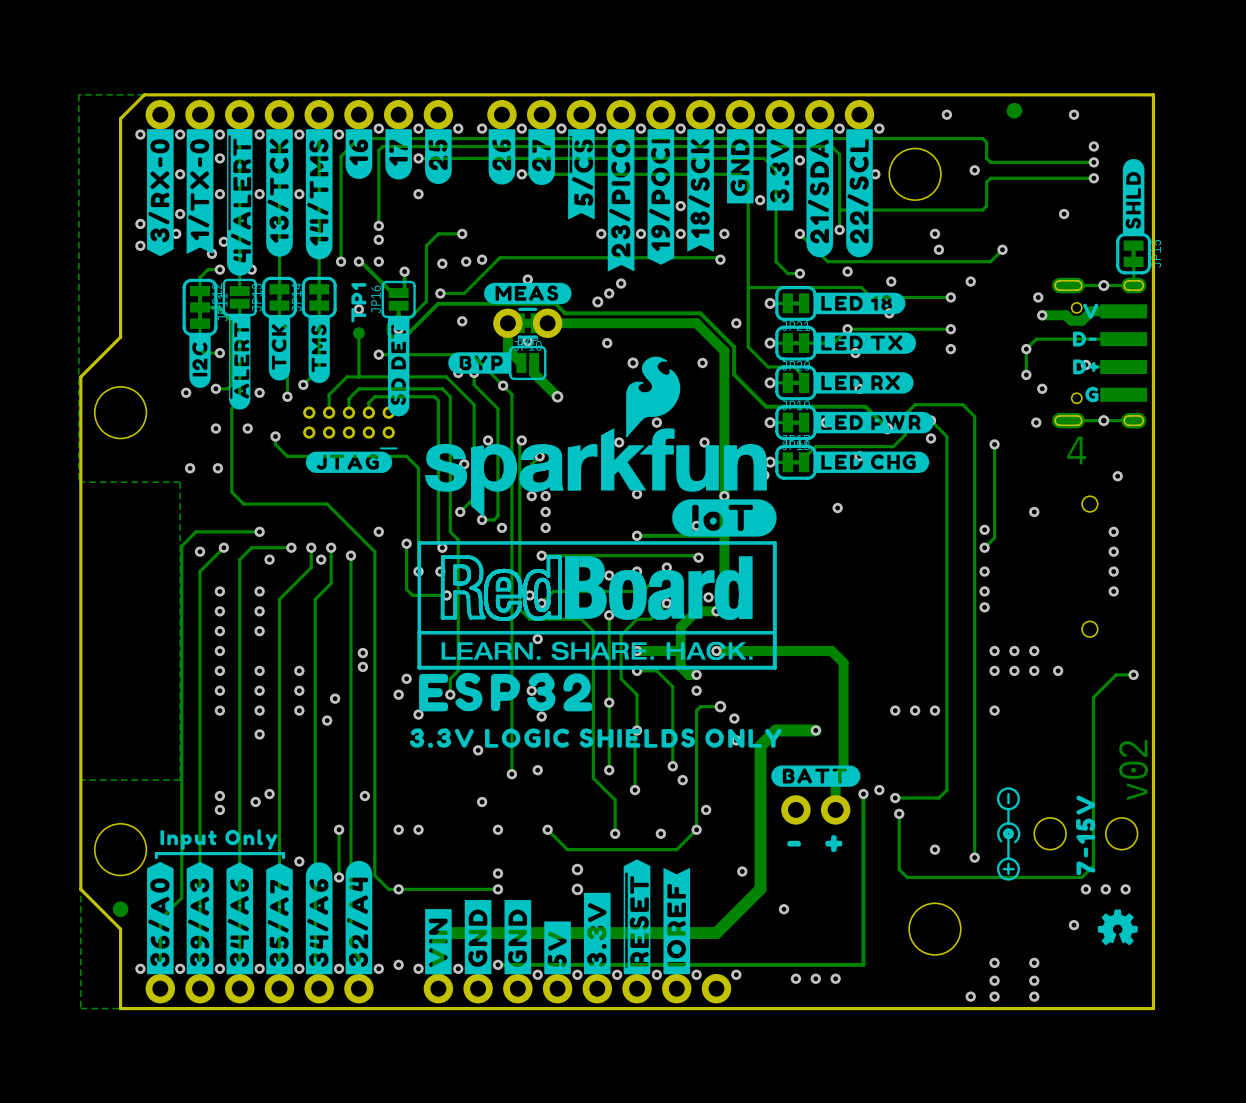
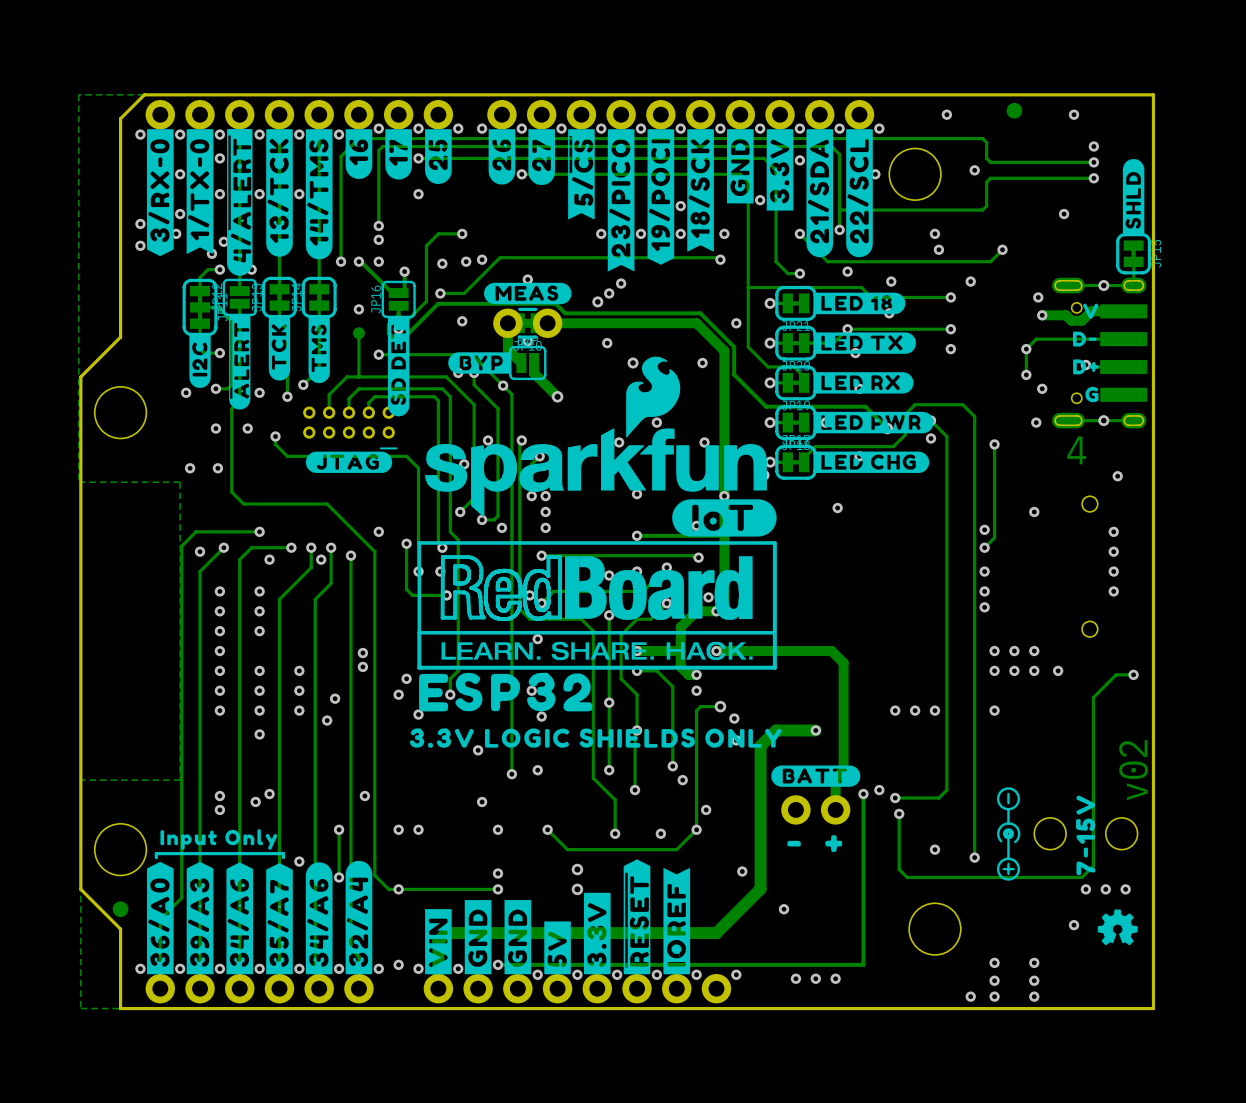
drawing: [351, 283, 367, 323] -> none

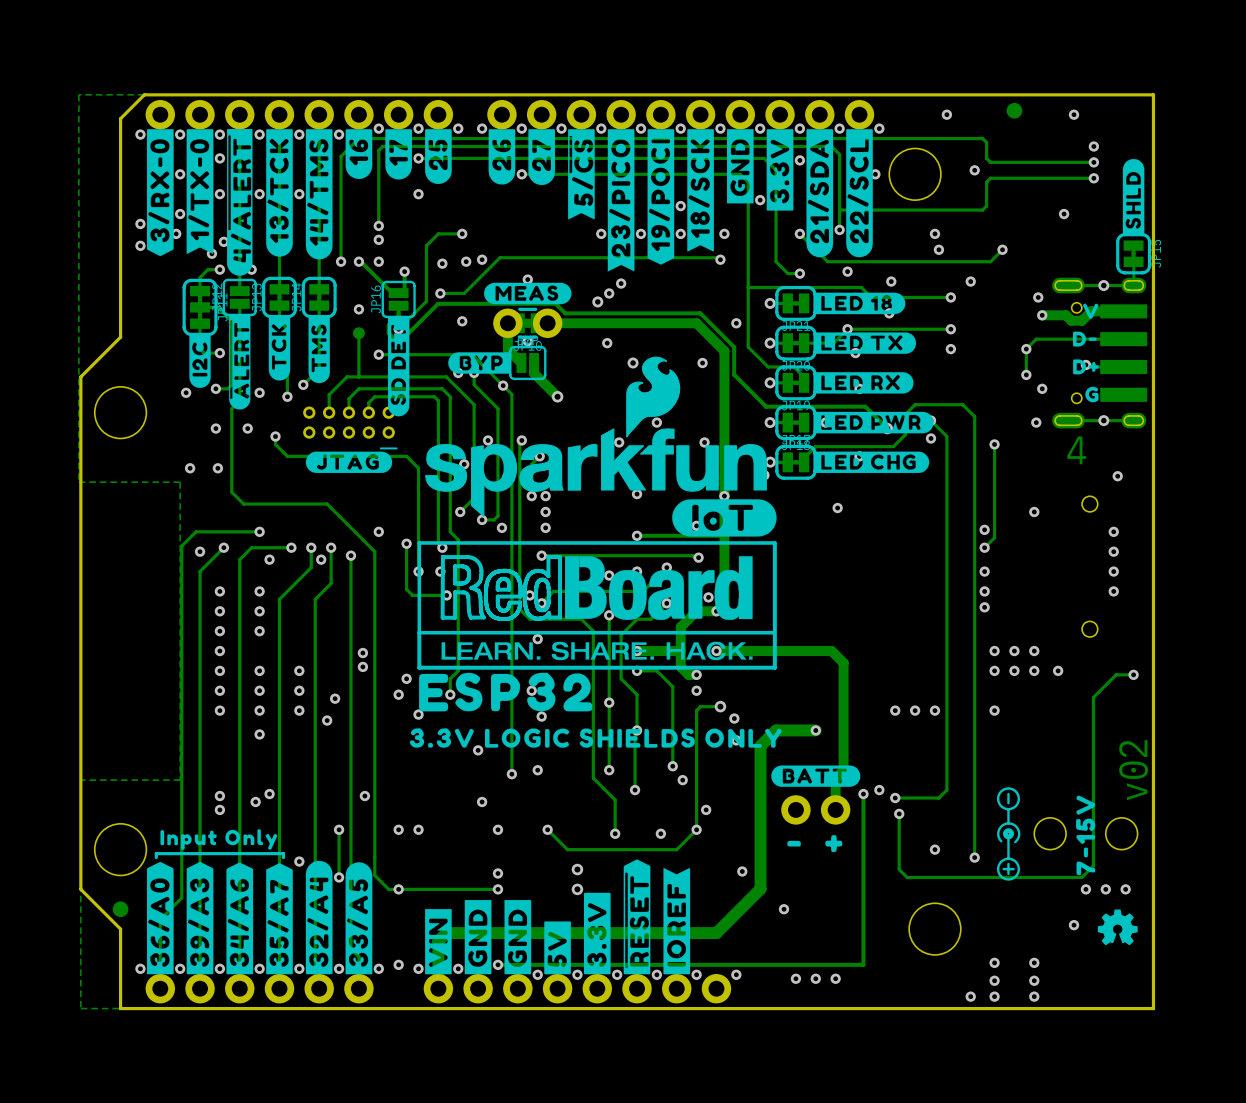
drawing: [305, 862, 333, 975] -> none
drawing: none -> [345, 862, 373, 975]
drawing position: (358, 917) -> (319, 917)

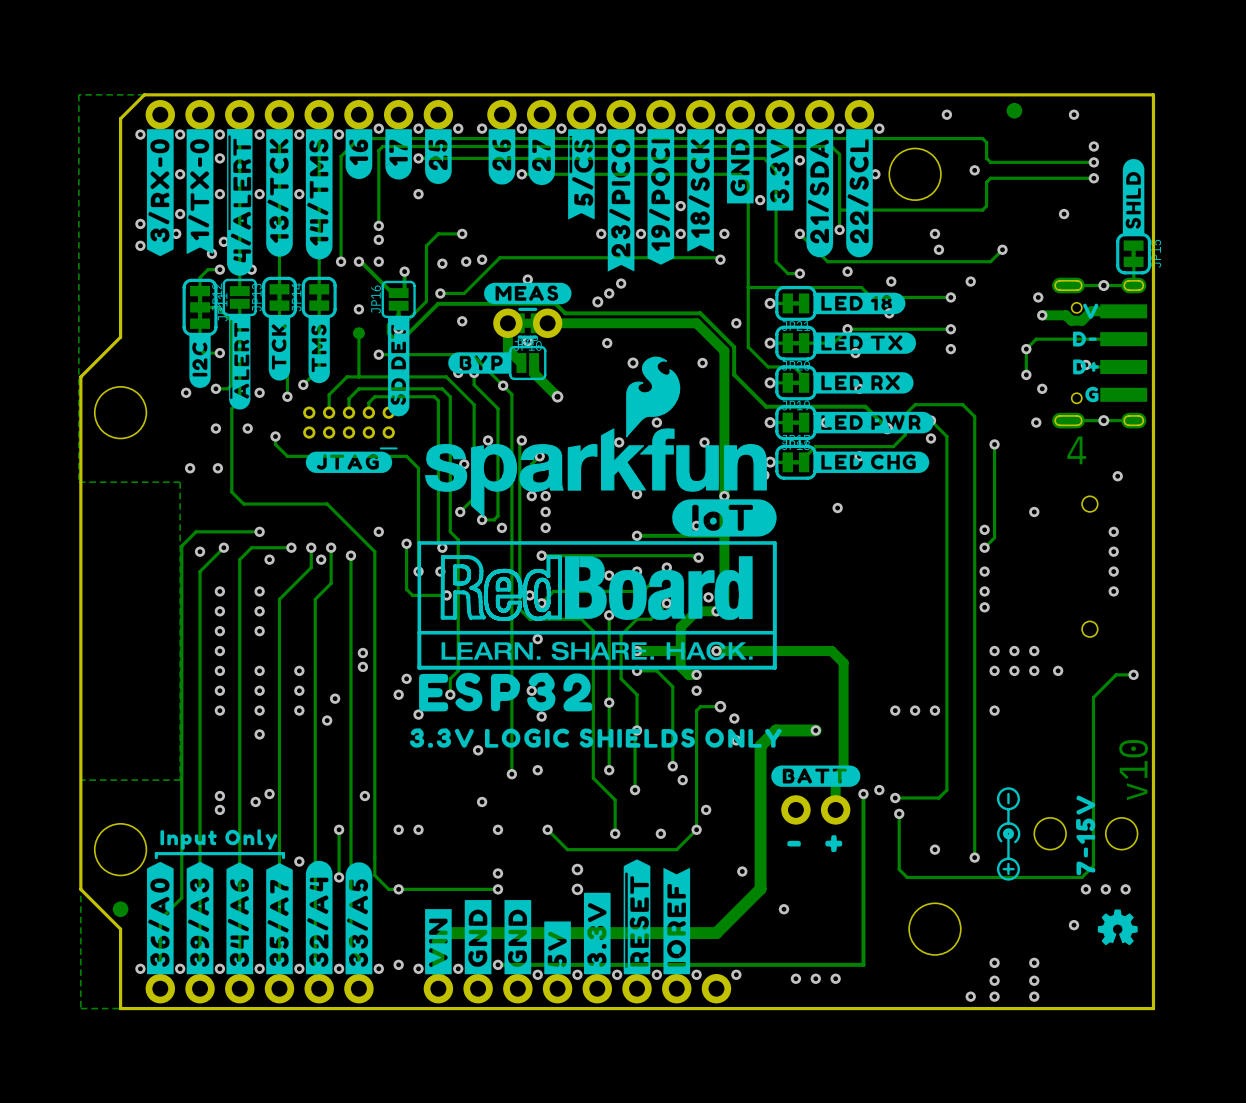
text: v02 (1133, 770) -> v10 (1133, 770)

